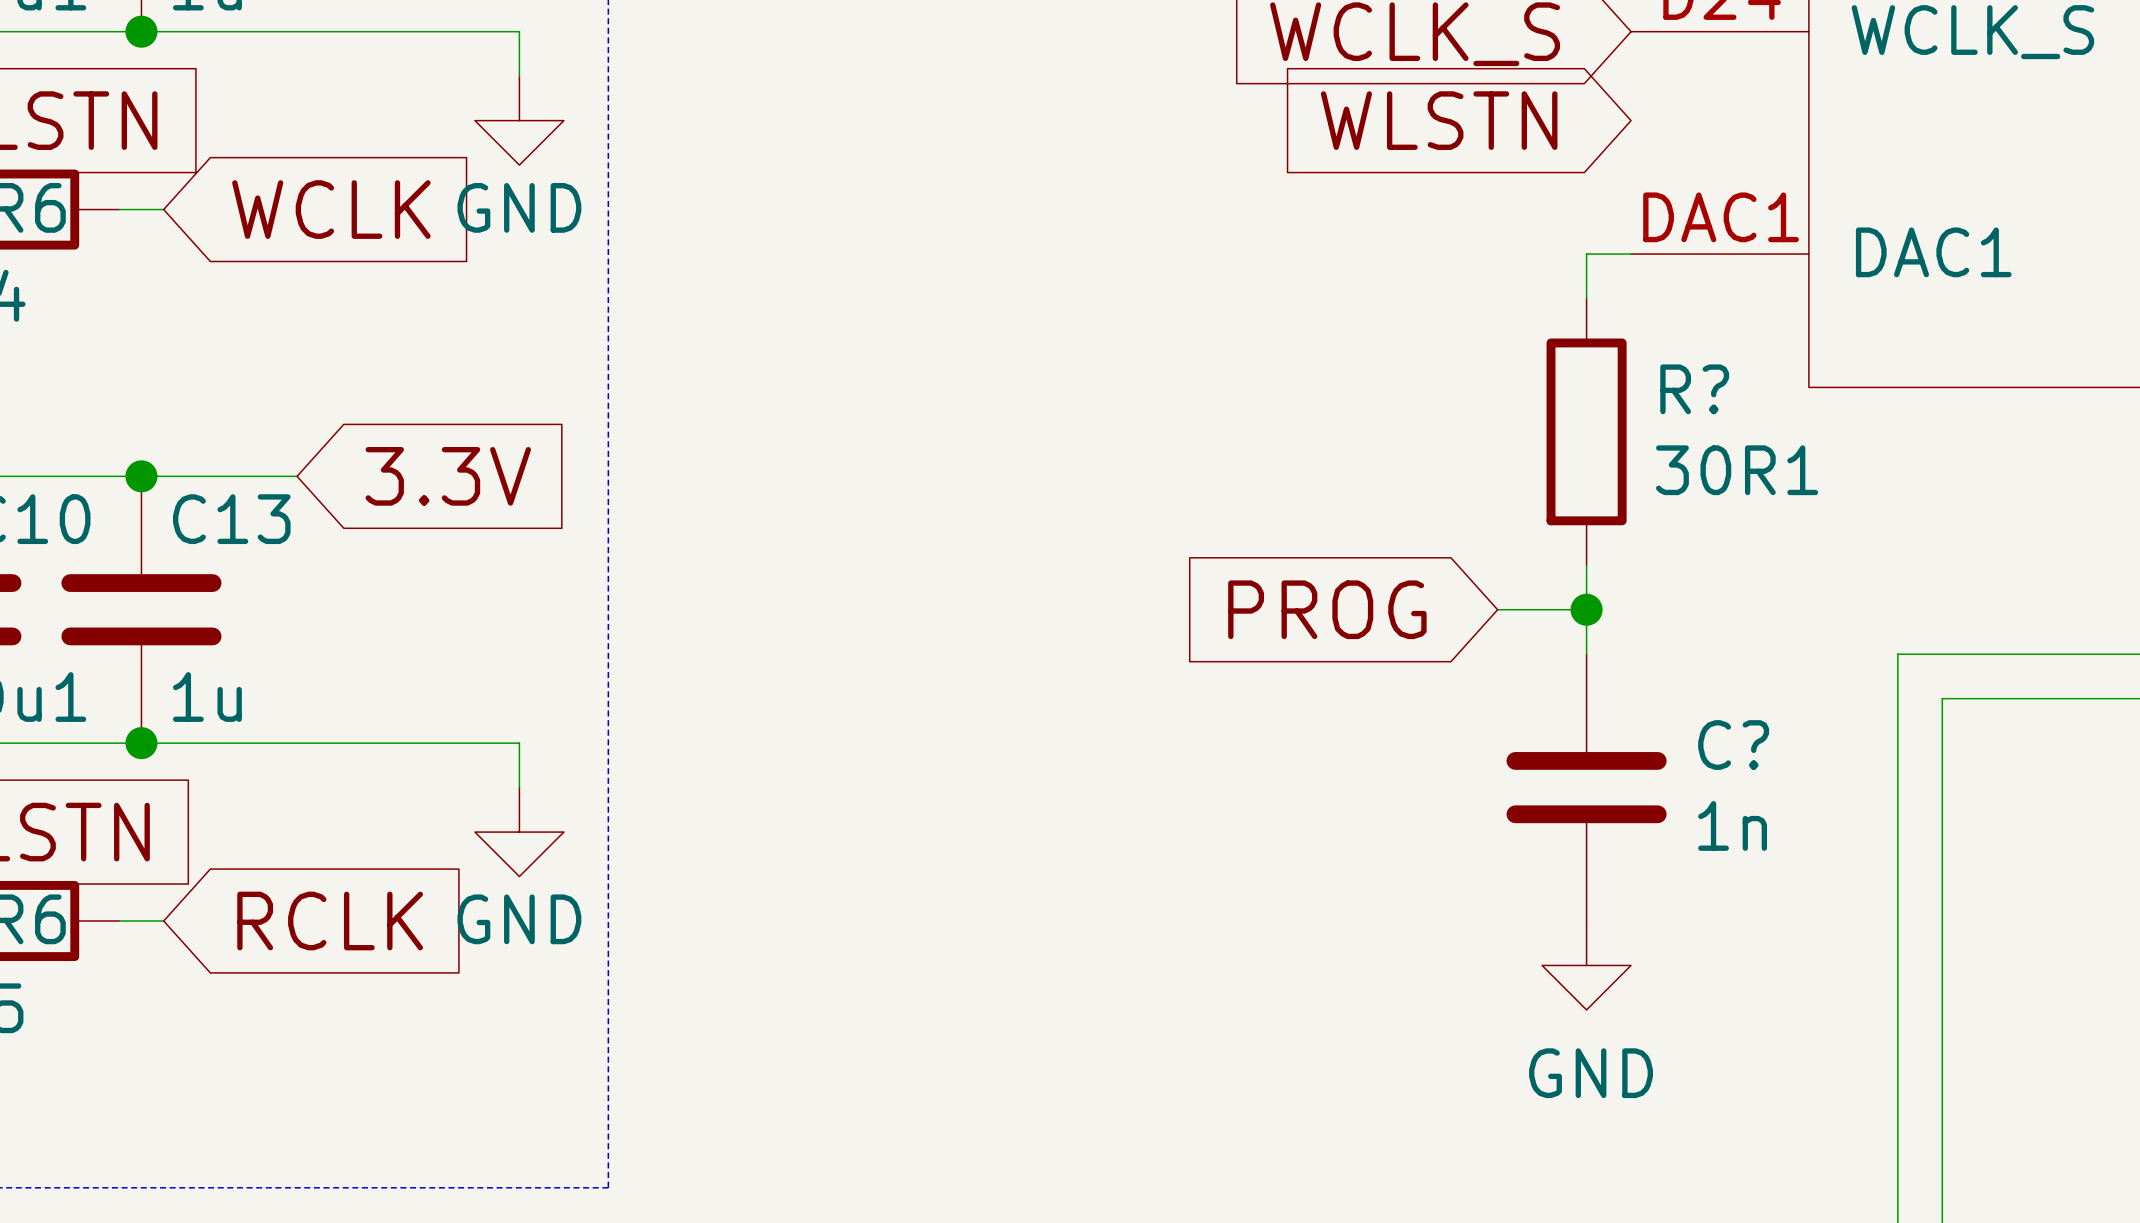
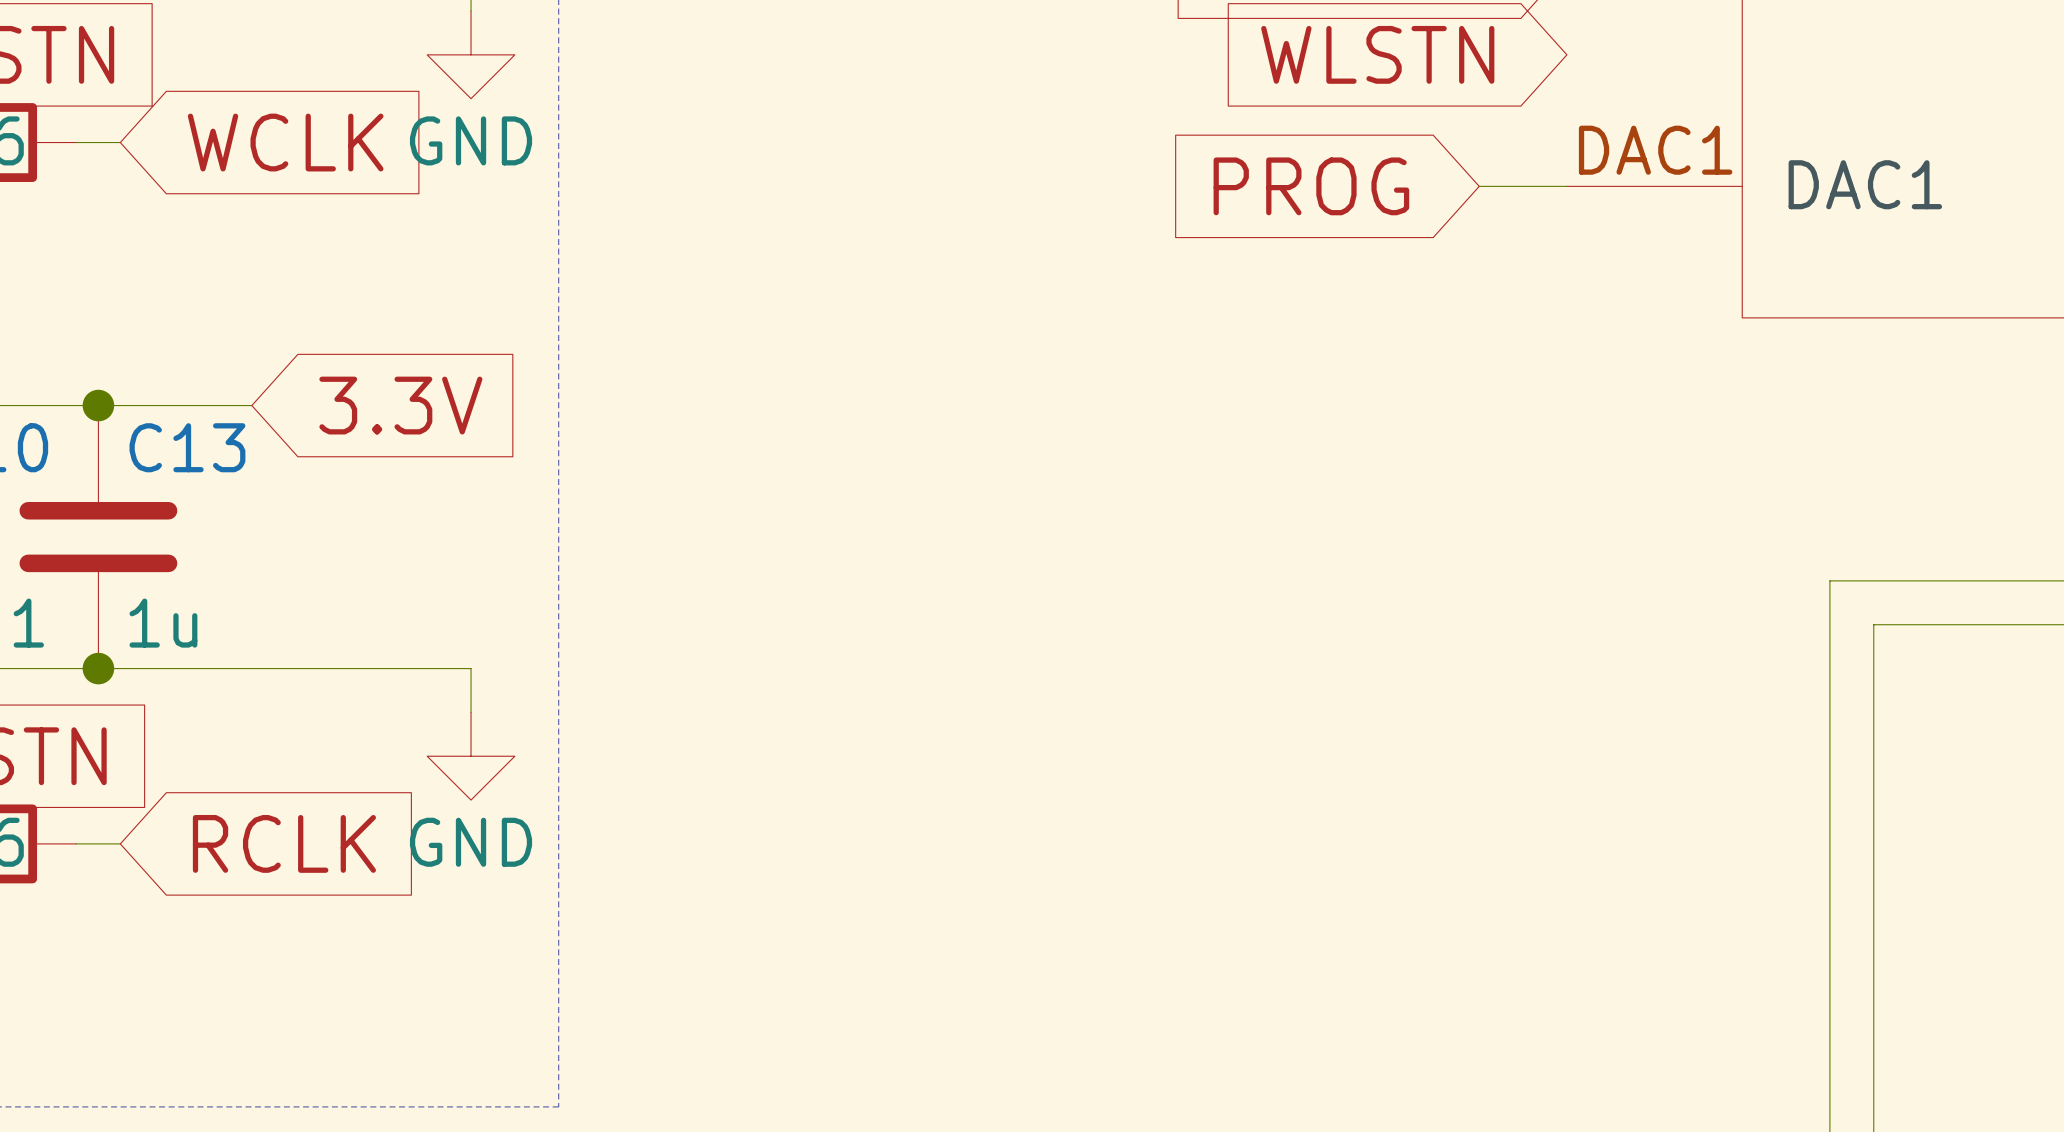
wire: (1586, 254) (1586, 298) -> (1523, 186) (1479, 186)
R?: 30R1 (1586, 431) -> none
wire: (1586, 565) (1586, 654) -> none
global label position: PROG (1327, 609) -> PROG (1311, 186)
wire: (1497, 609) (1586, 609) -> none
junction: (1586, 609) -> none
C?: 1n (1586, 787) -> none
power symbol: GND (1586, 965) -> none

